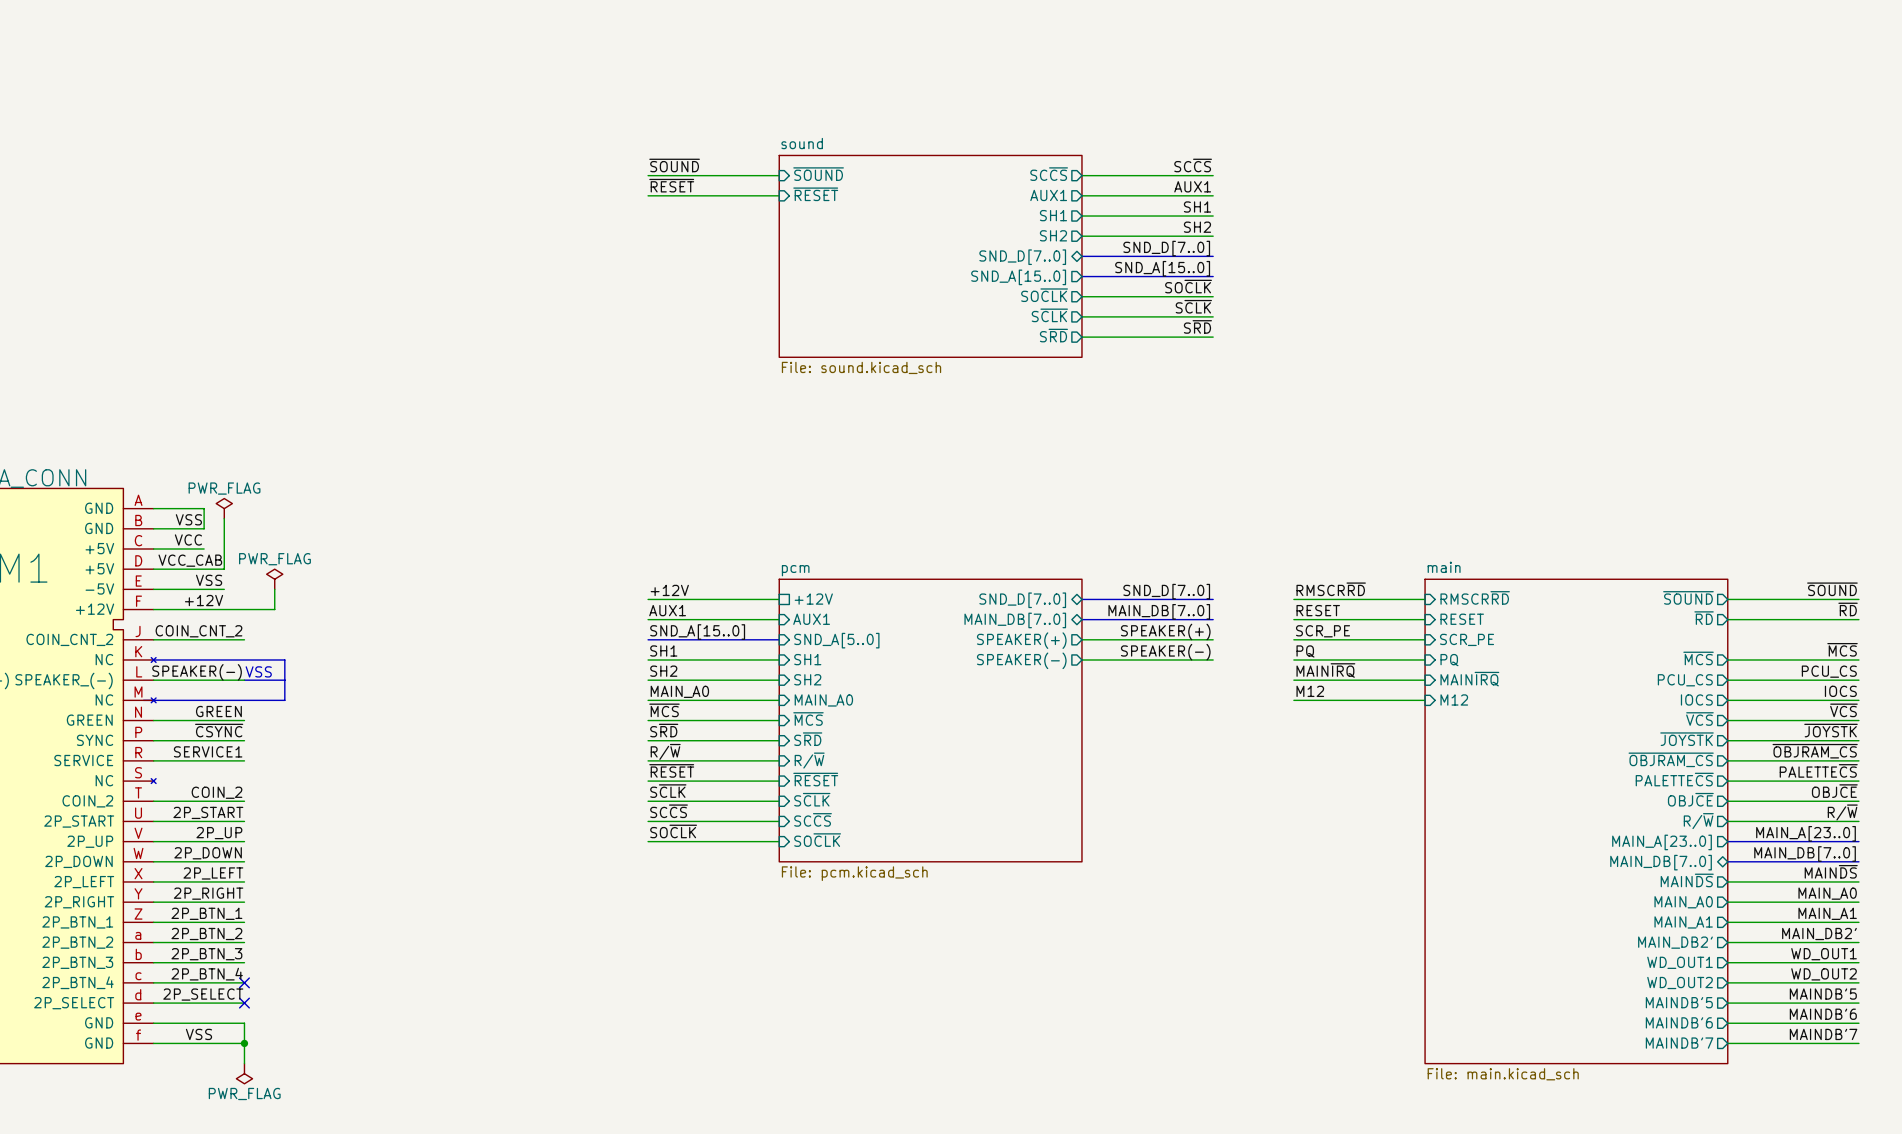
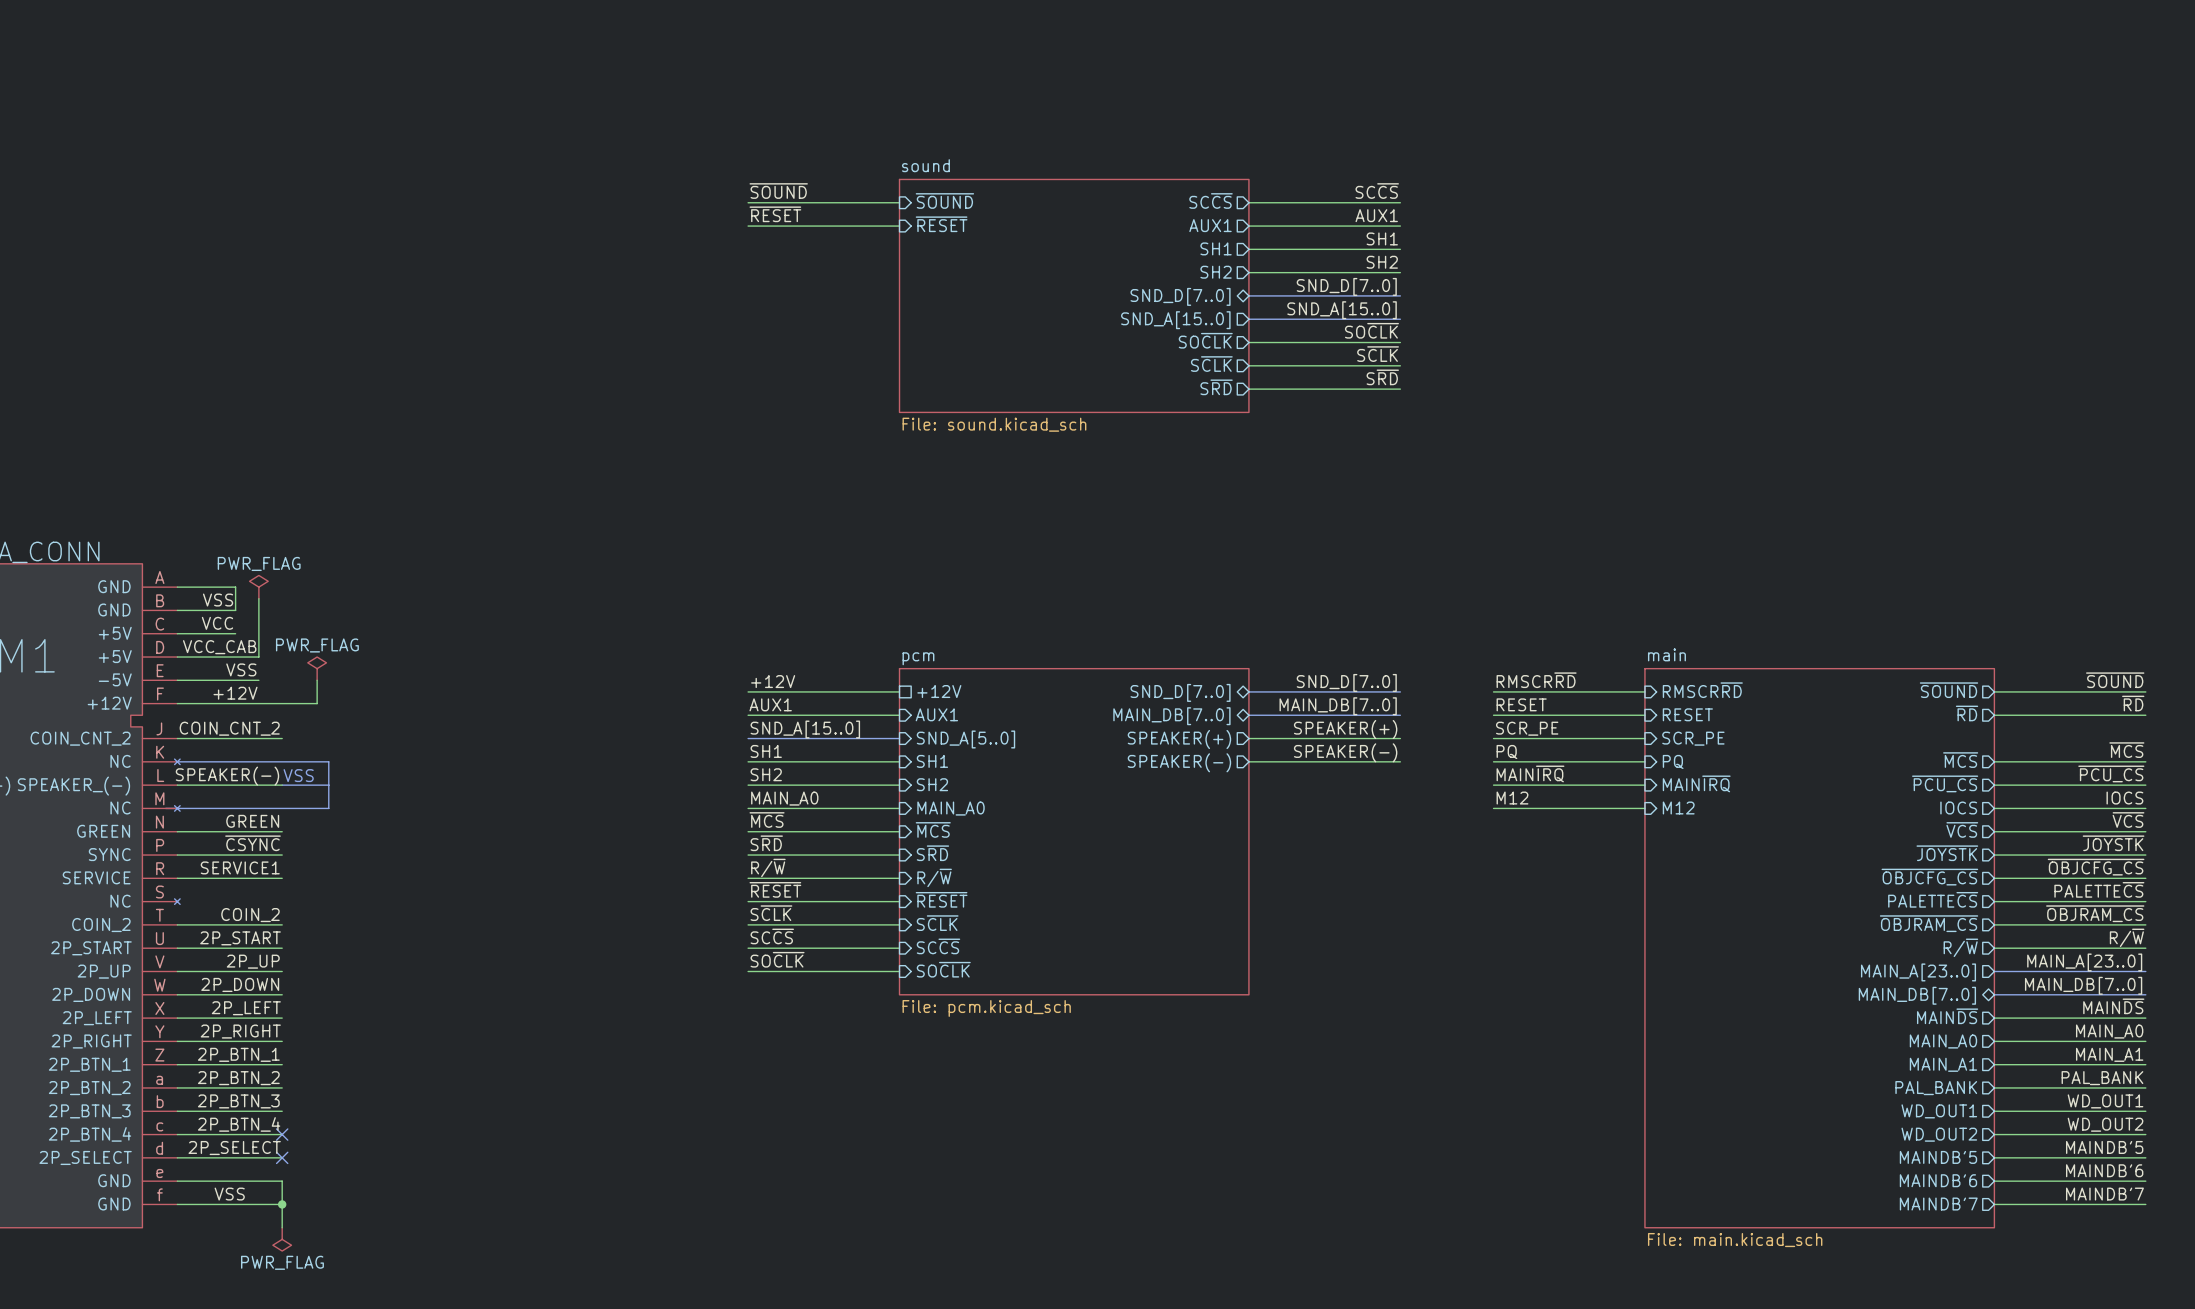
label: PCU_CS (1829, 671) -> ~{PCU_CS} (2111, 773)
sheet pin: PCU_CS (1685, 680) -> ~{PCU_CS} (1945, 783)
label: ~{OBJRAM_CS} (1815, 751) -> ~{OBJCFG_CS} (2096, 867)
sheet pin: ~{OBJRAM_CS} (1671, 759) -> ~{OBJCFG_CS} (1929, 877)
label: OBJ~{CE} (1834, 791) -> ~{OBJRAM_CS} (2095, 913)
sheet pin: OBJ~{CE} (1690, 799) -> ~{OBJRAM_CS} (1929, 923)
label: MAIN_DB2' (1819, 934) -> PAL_BANK (2102, 1078)
sheet pin: MAIN_DB2' (1675, 942) -> PAL_BANK (1936, 1088)

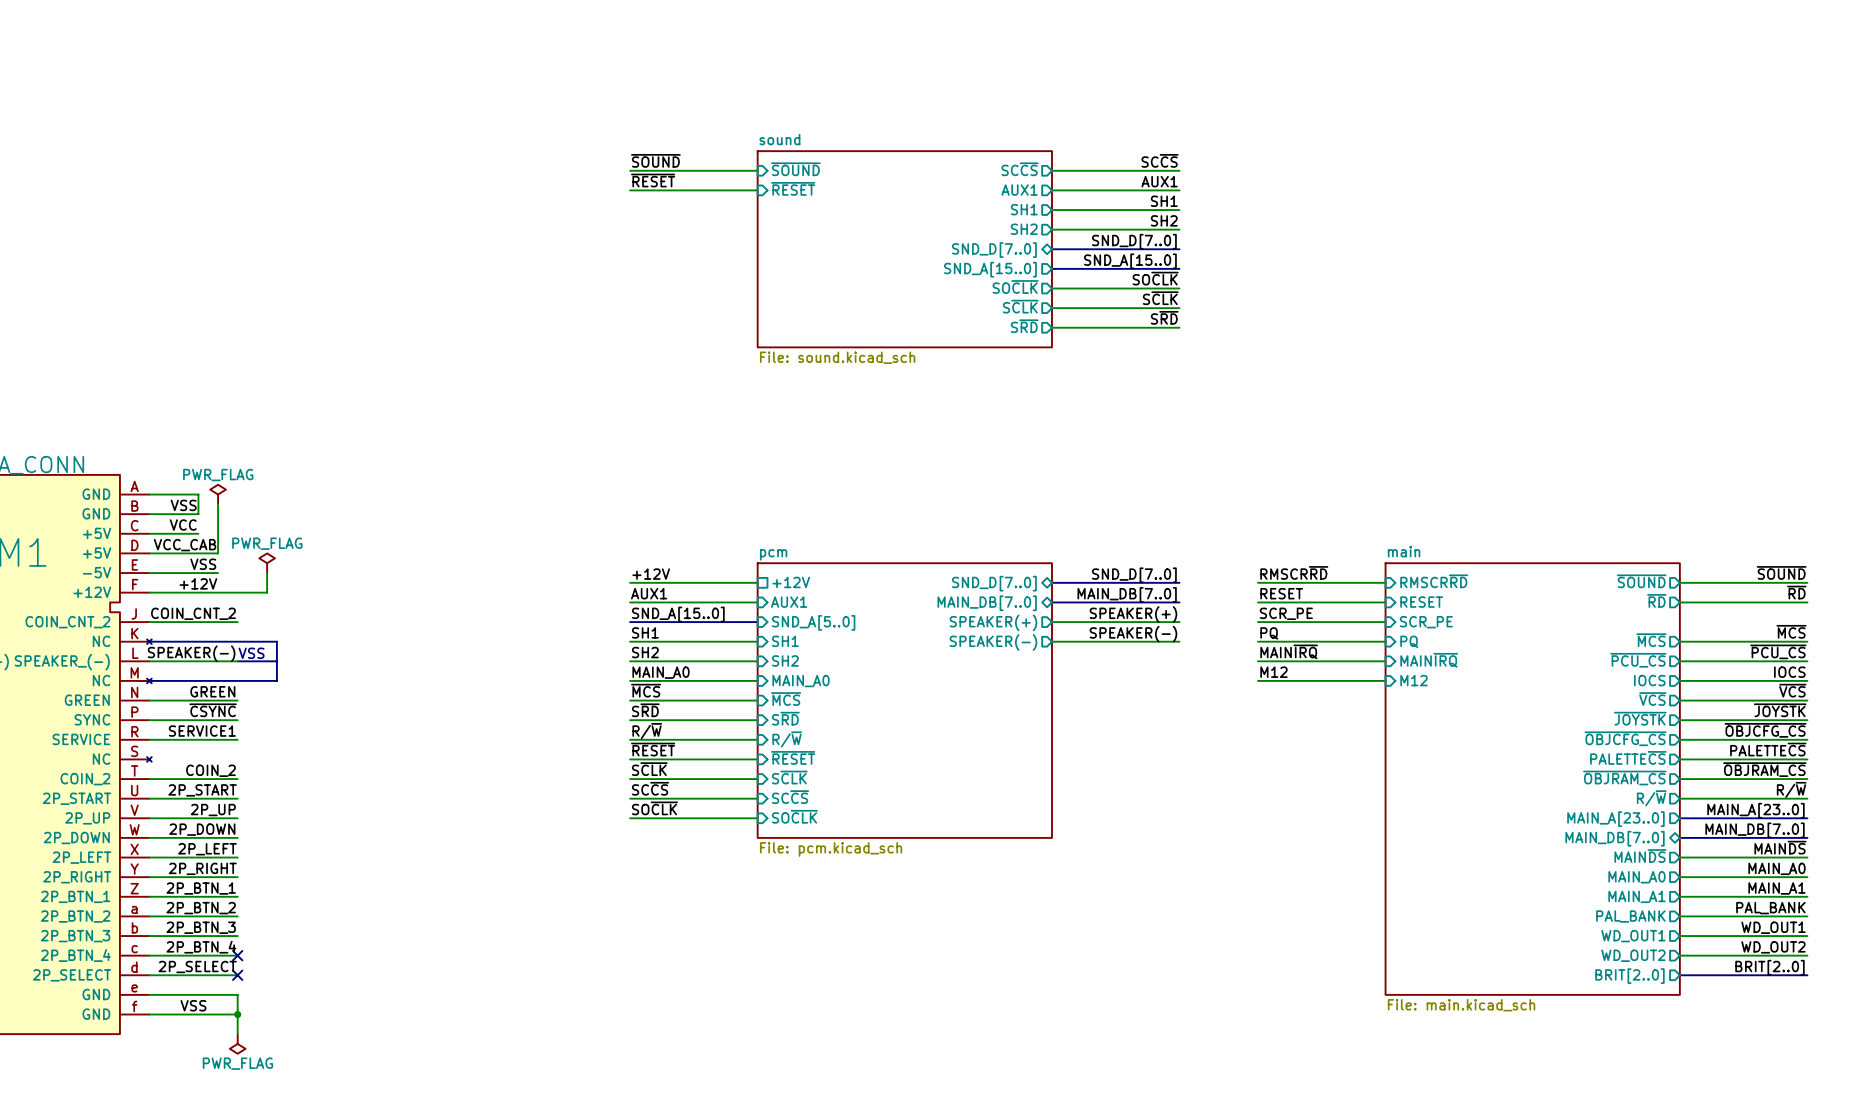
sheet main: none -> File: main.kicad_sch (1532, 779)
sheet main: File: main.kicad_sch (1819, 948) -> none
label: MAINDB'5 (2104, 1147) -> BRIT[2..0] (1769, 967)
sheet pin: MAINDB'5 (1938, 1157) -> BRIT[2..0] (1629, 976)
bus: none -> (1679, 975) (1807, 975)
label: MAINDB'6 (2104, 1170) -> none
sheet pin: MAINDB'6 (1938, 1180) -> none
wire: (1994, 1181) (2145, 1181) -> none
label: MAINDB'7 (2104, 1194) -> none
sheet pin: MAINDB'7 (1938, 1204) -> none
wire: (1994, 1204) (2145, 1204) -> none

